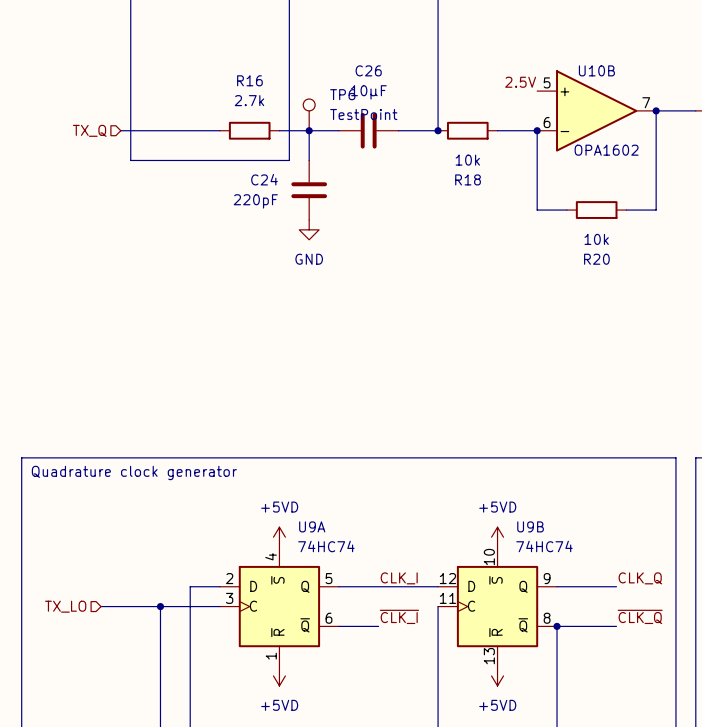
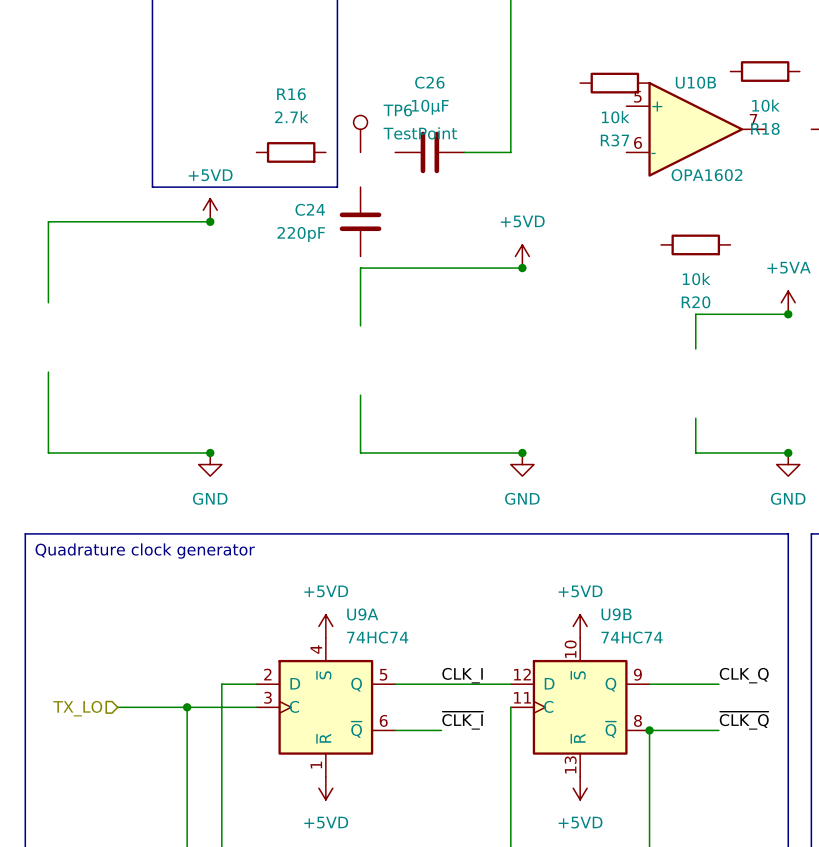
R37: none -> 10k (614, 83)
label: 2.5V (520, 82) -> none
junction: (656, 110) -> none
wire: (695, 110) (656, 110) (656, 210) (626, 210) -> none
hierarchical label: TX_Q (89, 130) -> none
wire: (120, 130) (219, 130) -> none
wire: (279, 130) (338, 130) -> none
wire: (309, 130) (309, 160) -> none
junction: (309, 130) -> none
junction: (438, 130) -> none
R18 position: (467, 130) -> (765, 71)
wire: (497, 130) (537, 130) (537, 210) (566, 210) -> none
junction: (537, 130) -> none
power symbol: none -> +5VD (210, 210)
wire: none -> (210, 221) (48, 221) (48, 302)
junction: none -> (210, 221)
power symbol: none -> +5VD (522, 256)
power symbol: GND (309, 229) -> none
wire: none -> (522, 268) (360, 268) (360, 325)
junction: none -> (522, 268)
power symbol: none -> +5VA (788, 302)
wire: none -> (788, 314) (695, 314) (695, 348)
junction: none -> (788, 314)
wire: none -> (48, 372) (48, 453) (210, 453)
wire: none -> (360, 395) (360, 453) (522, 453)
wire: none -> (695, 418) (695, 453) (788, 453)
junction: none -> (210, 453)
junction: none -> (522, 453)
junction: none -> (788, 453)
power symbol: none -> GND (210, 464)
power symbol: none -> GND (522, 464)
power symbol: none -> GND (788, 464)

